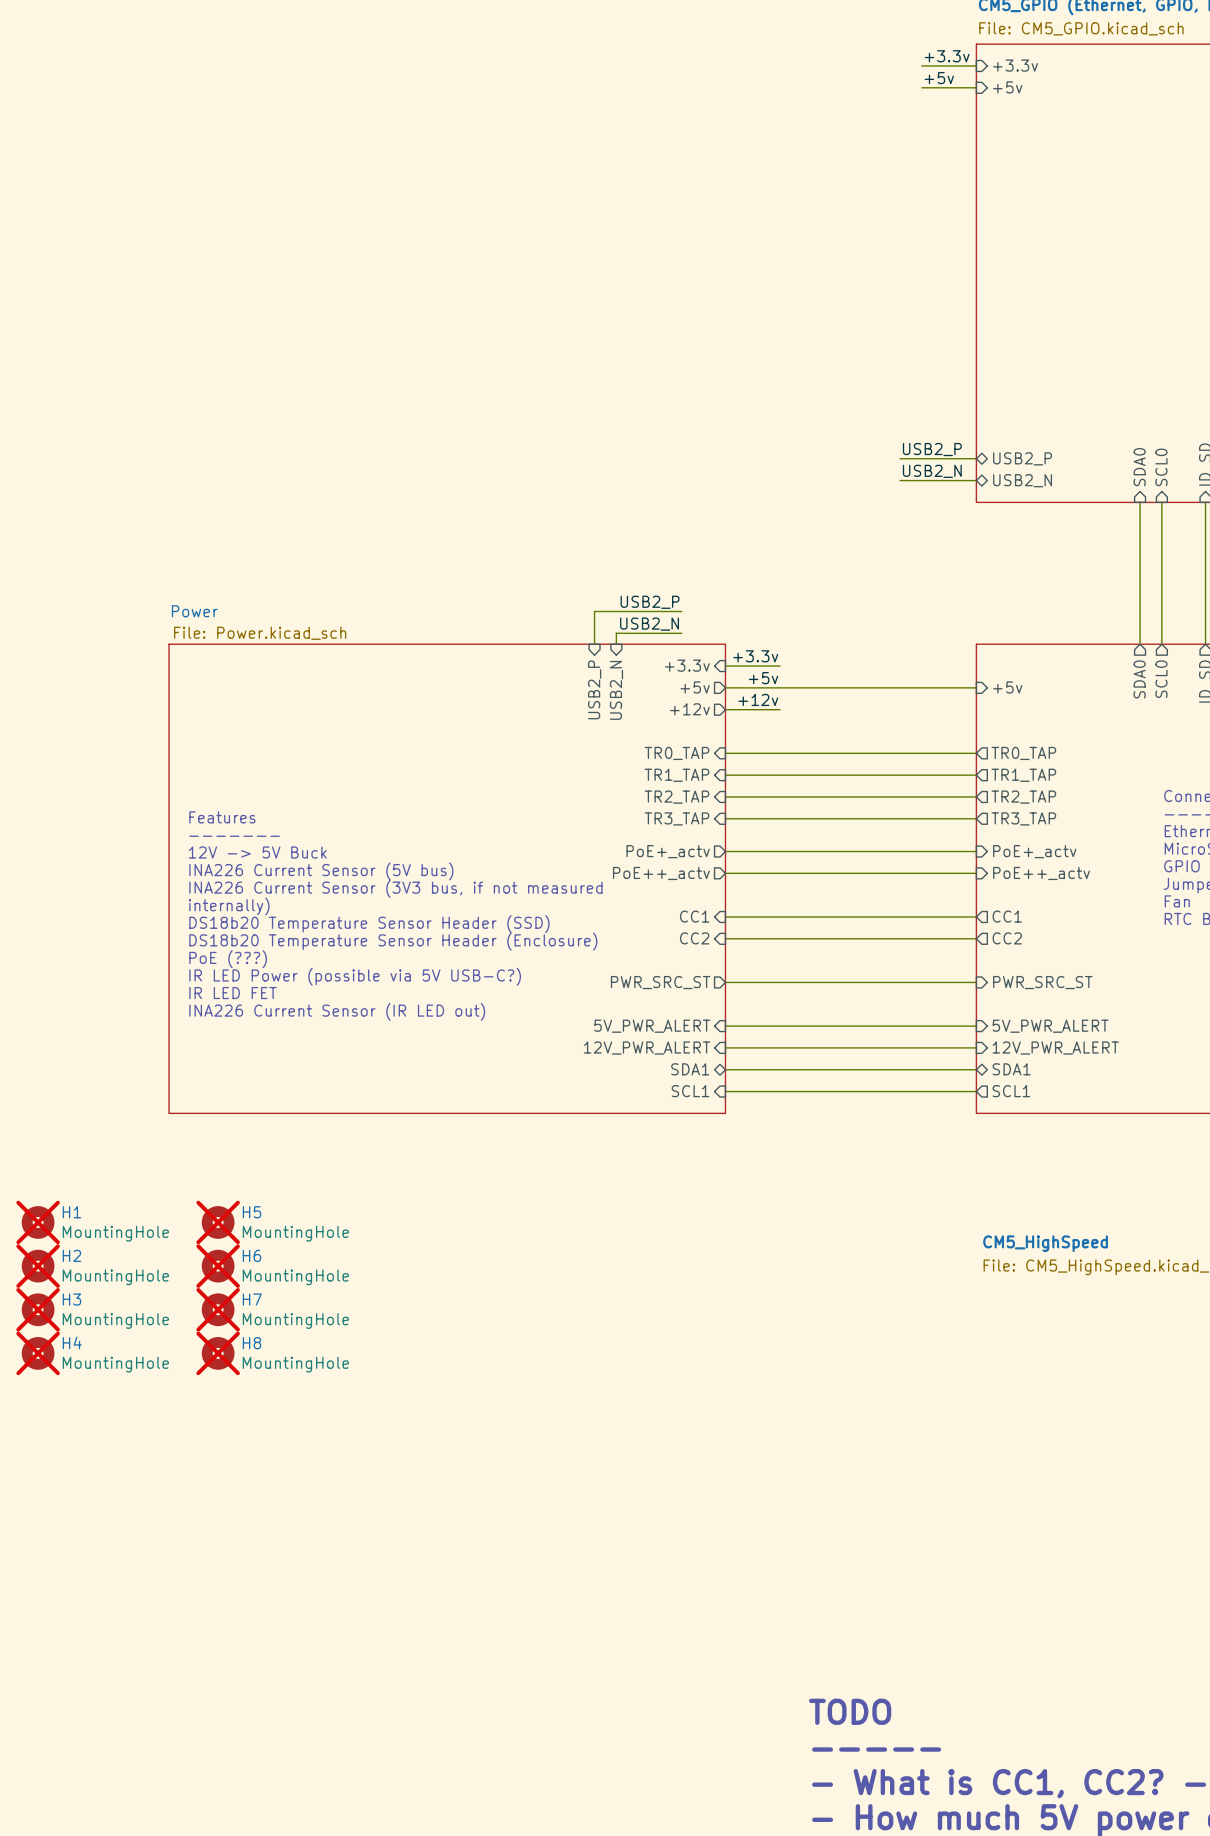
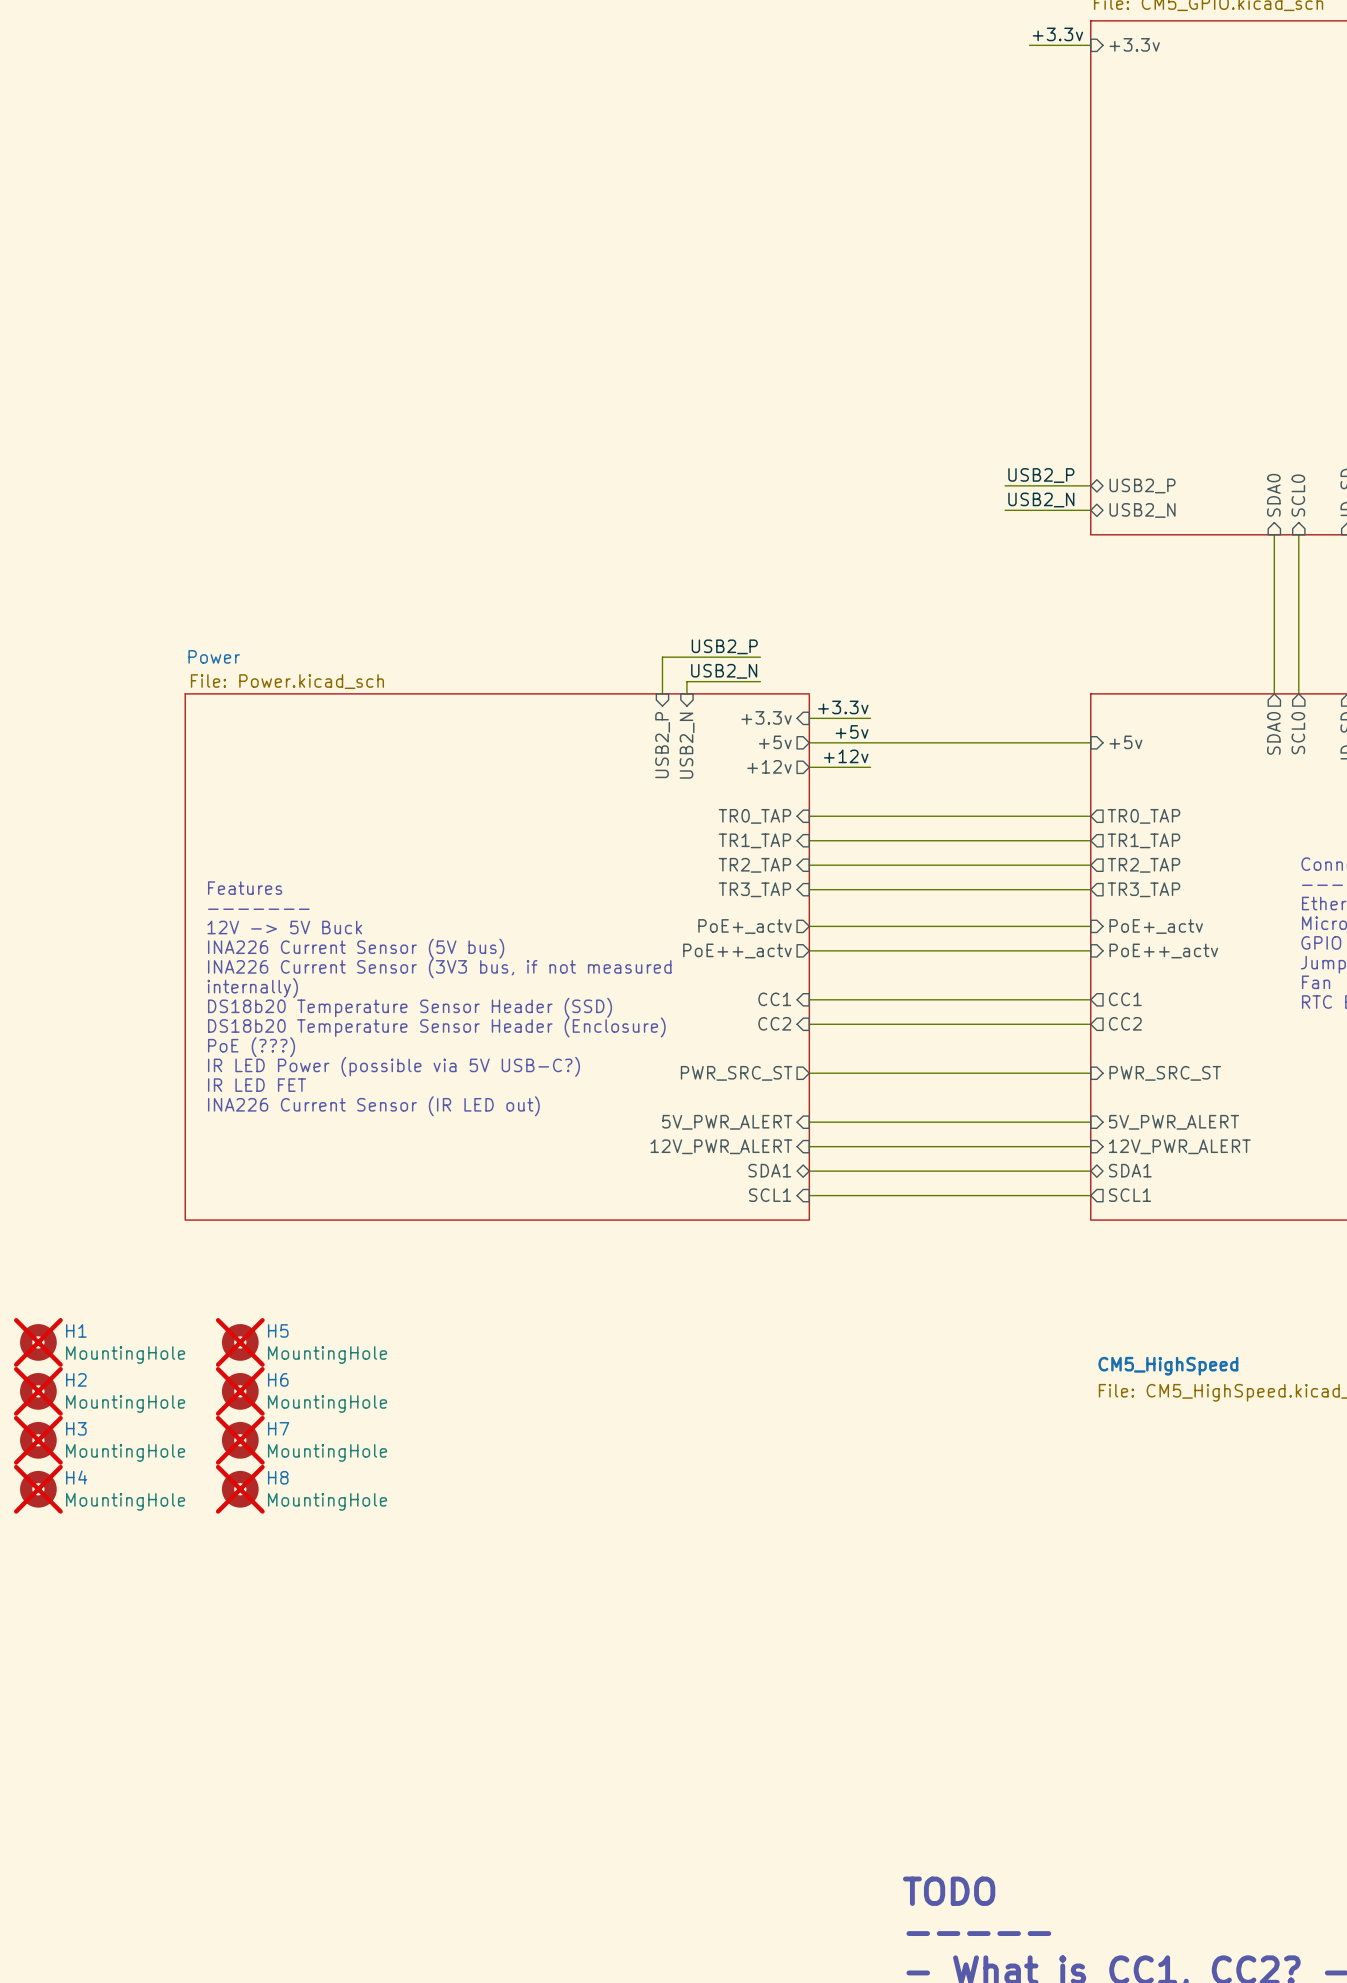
label: +5v (939, 78) -> none
wire: (921, 87) (976, 87) -> none
sheet pin: +5v (1007, 87) -> none

